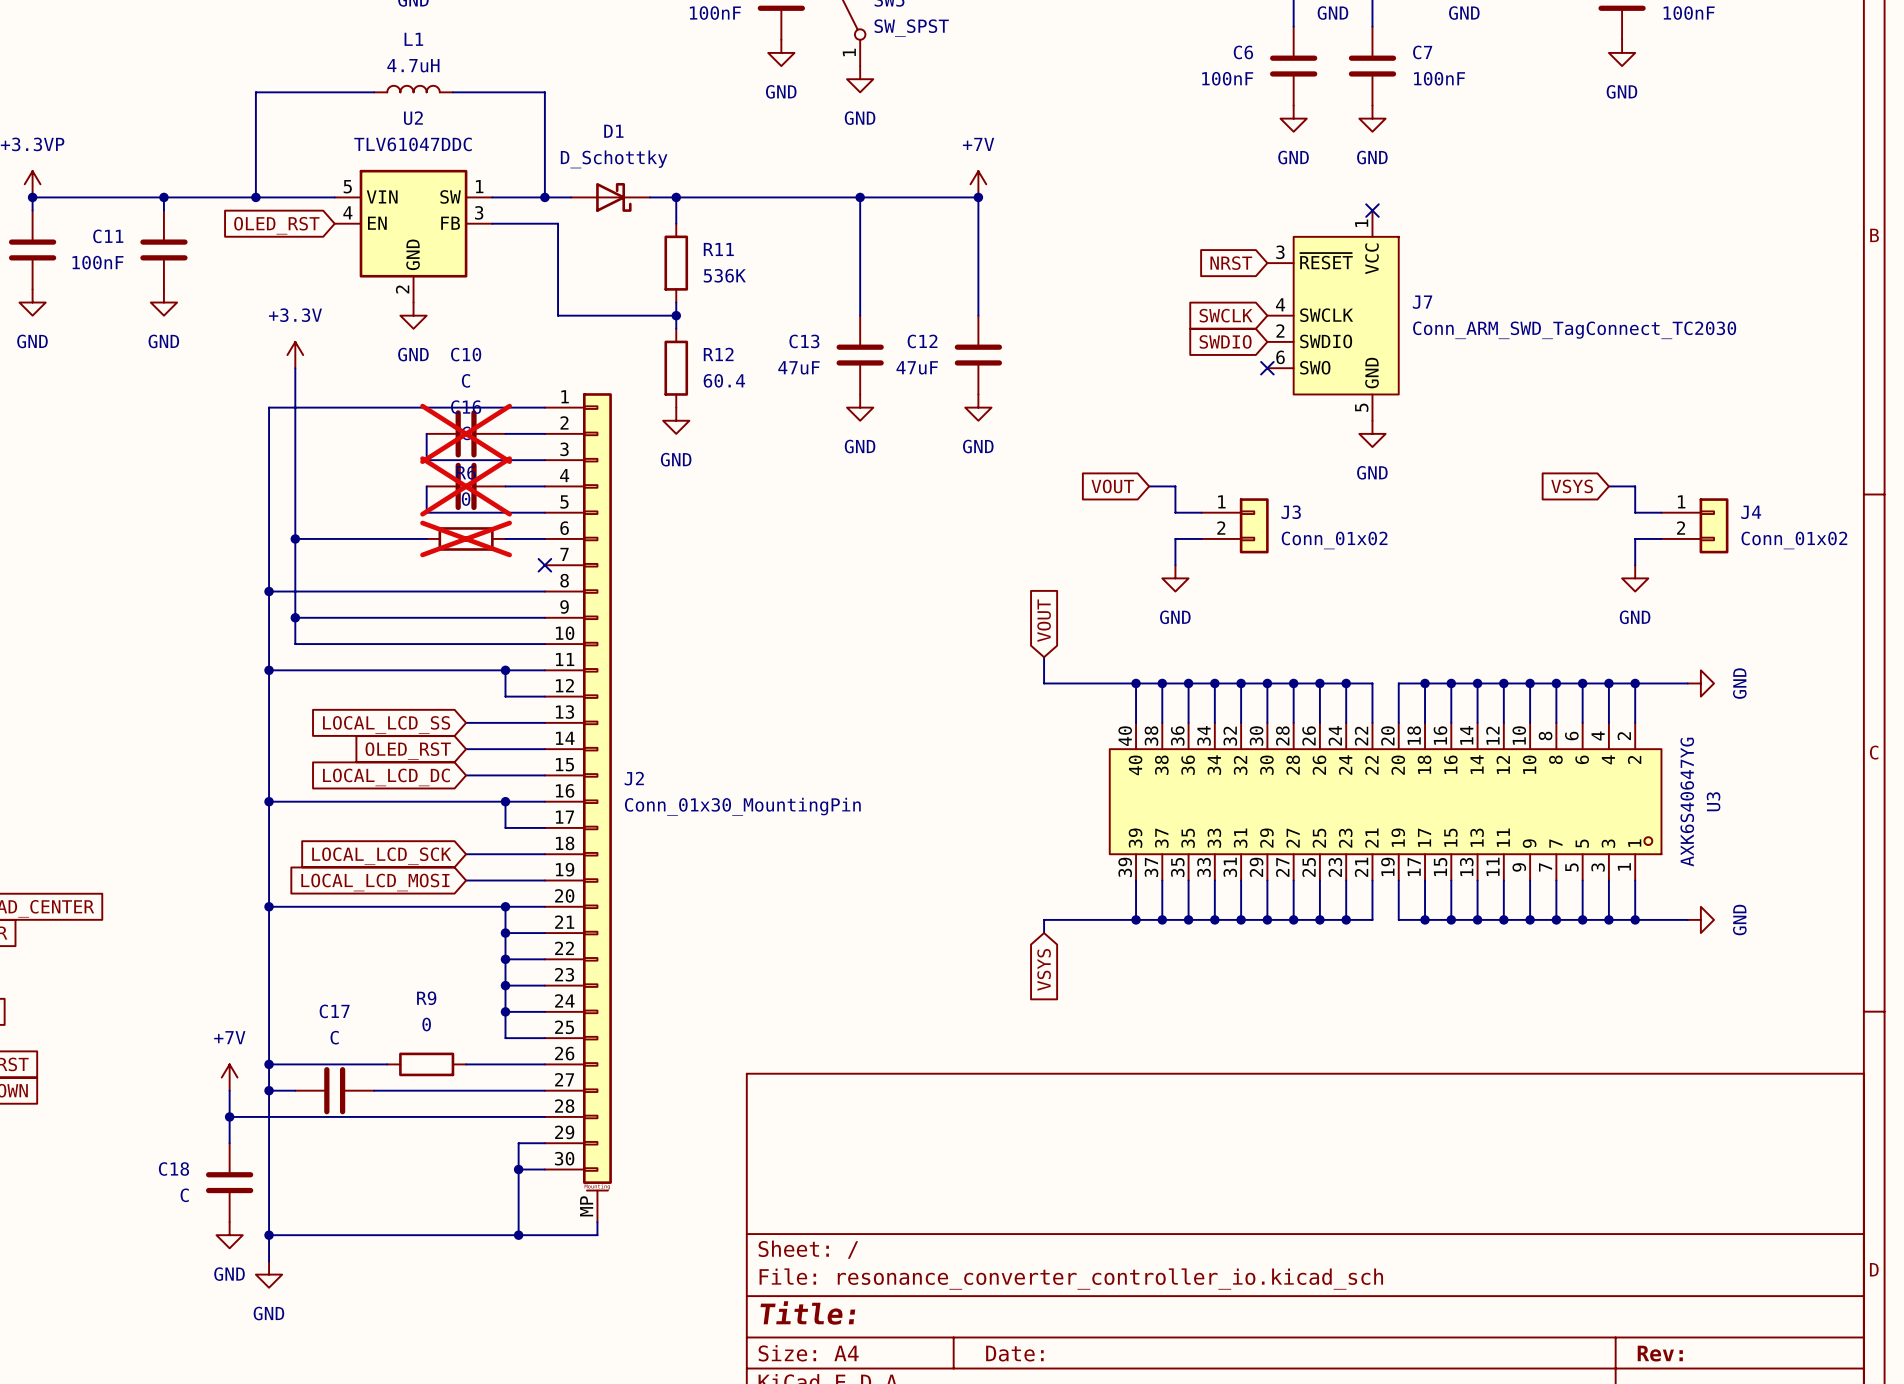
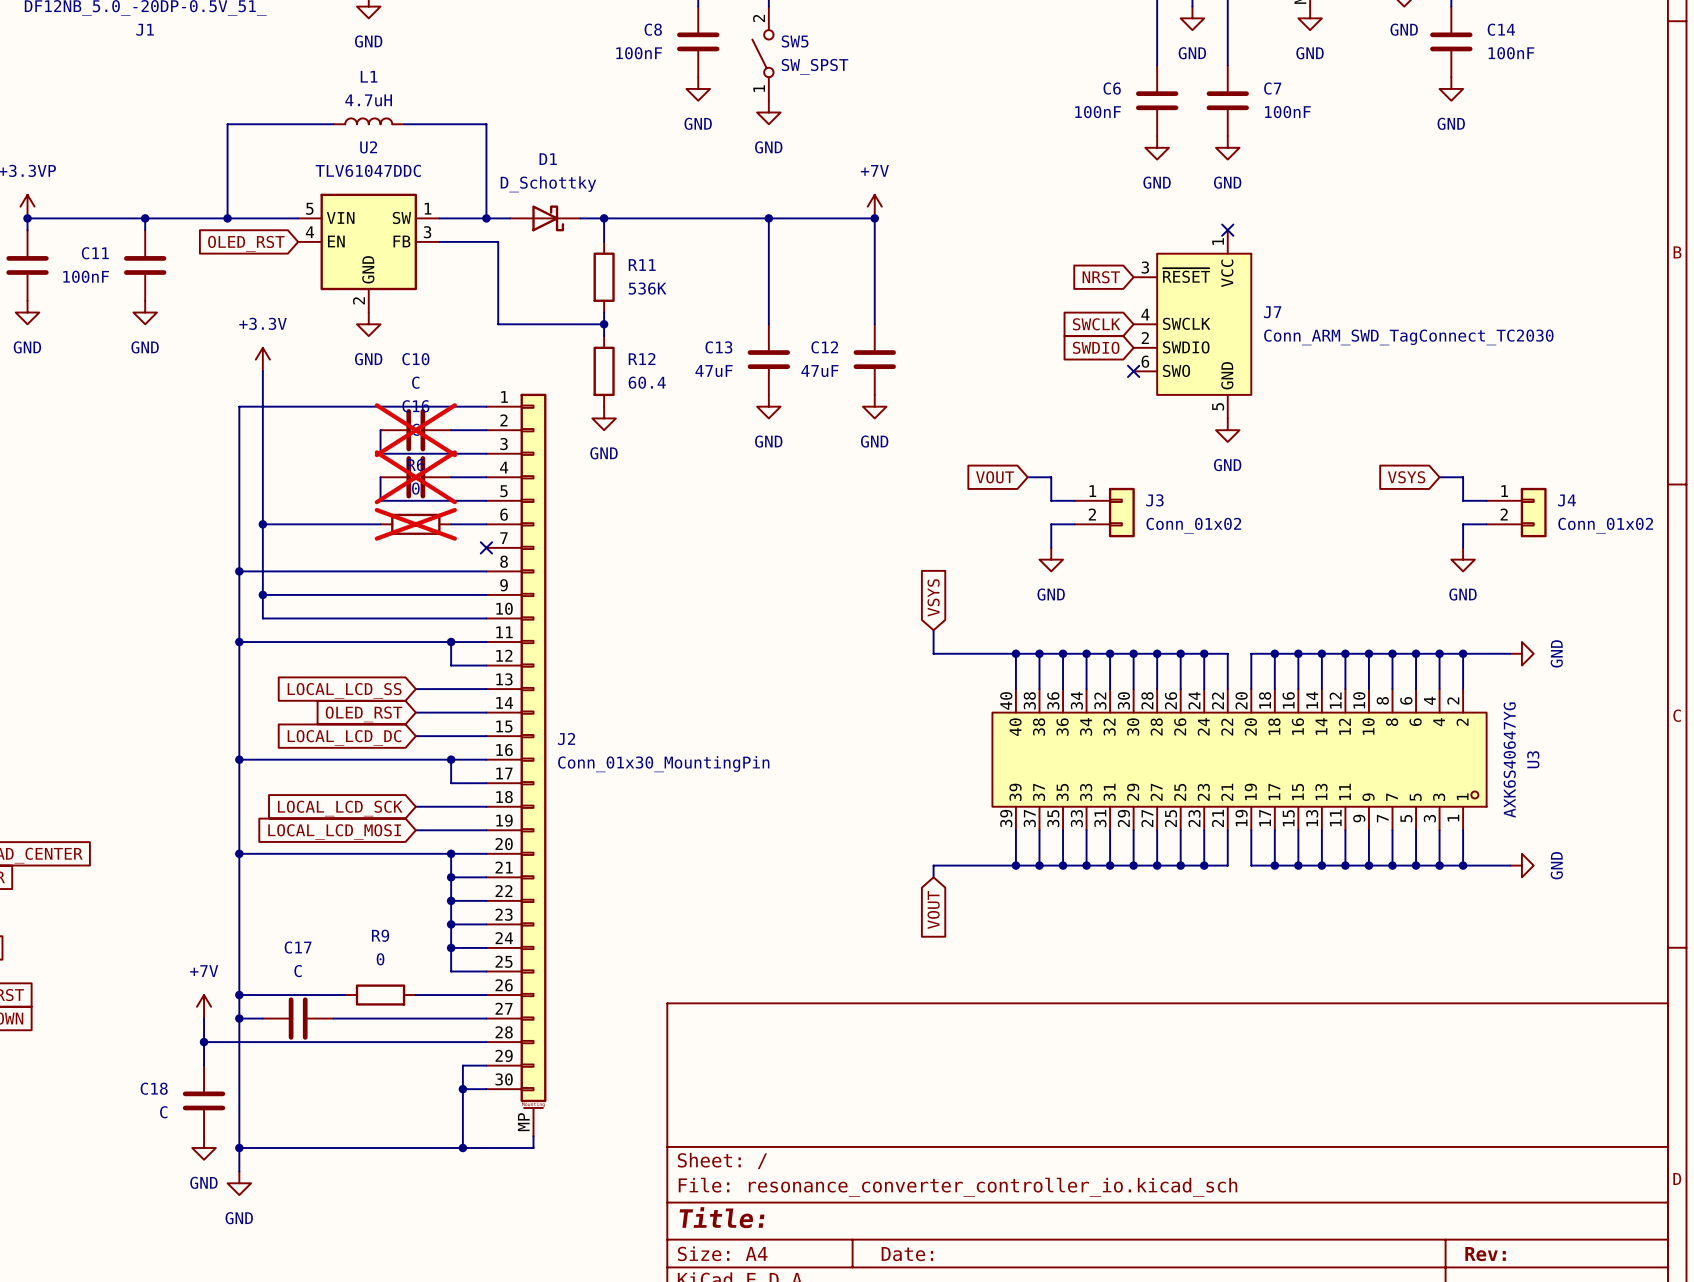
global label: VOUT (1044, 620) -> VSYS (933, 597)
global label: VSYS (1044, 969) -> VOUT (933, 909)

